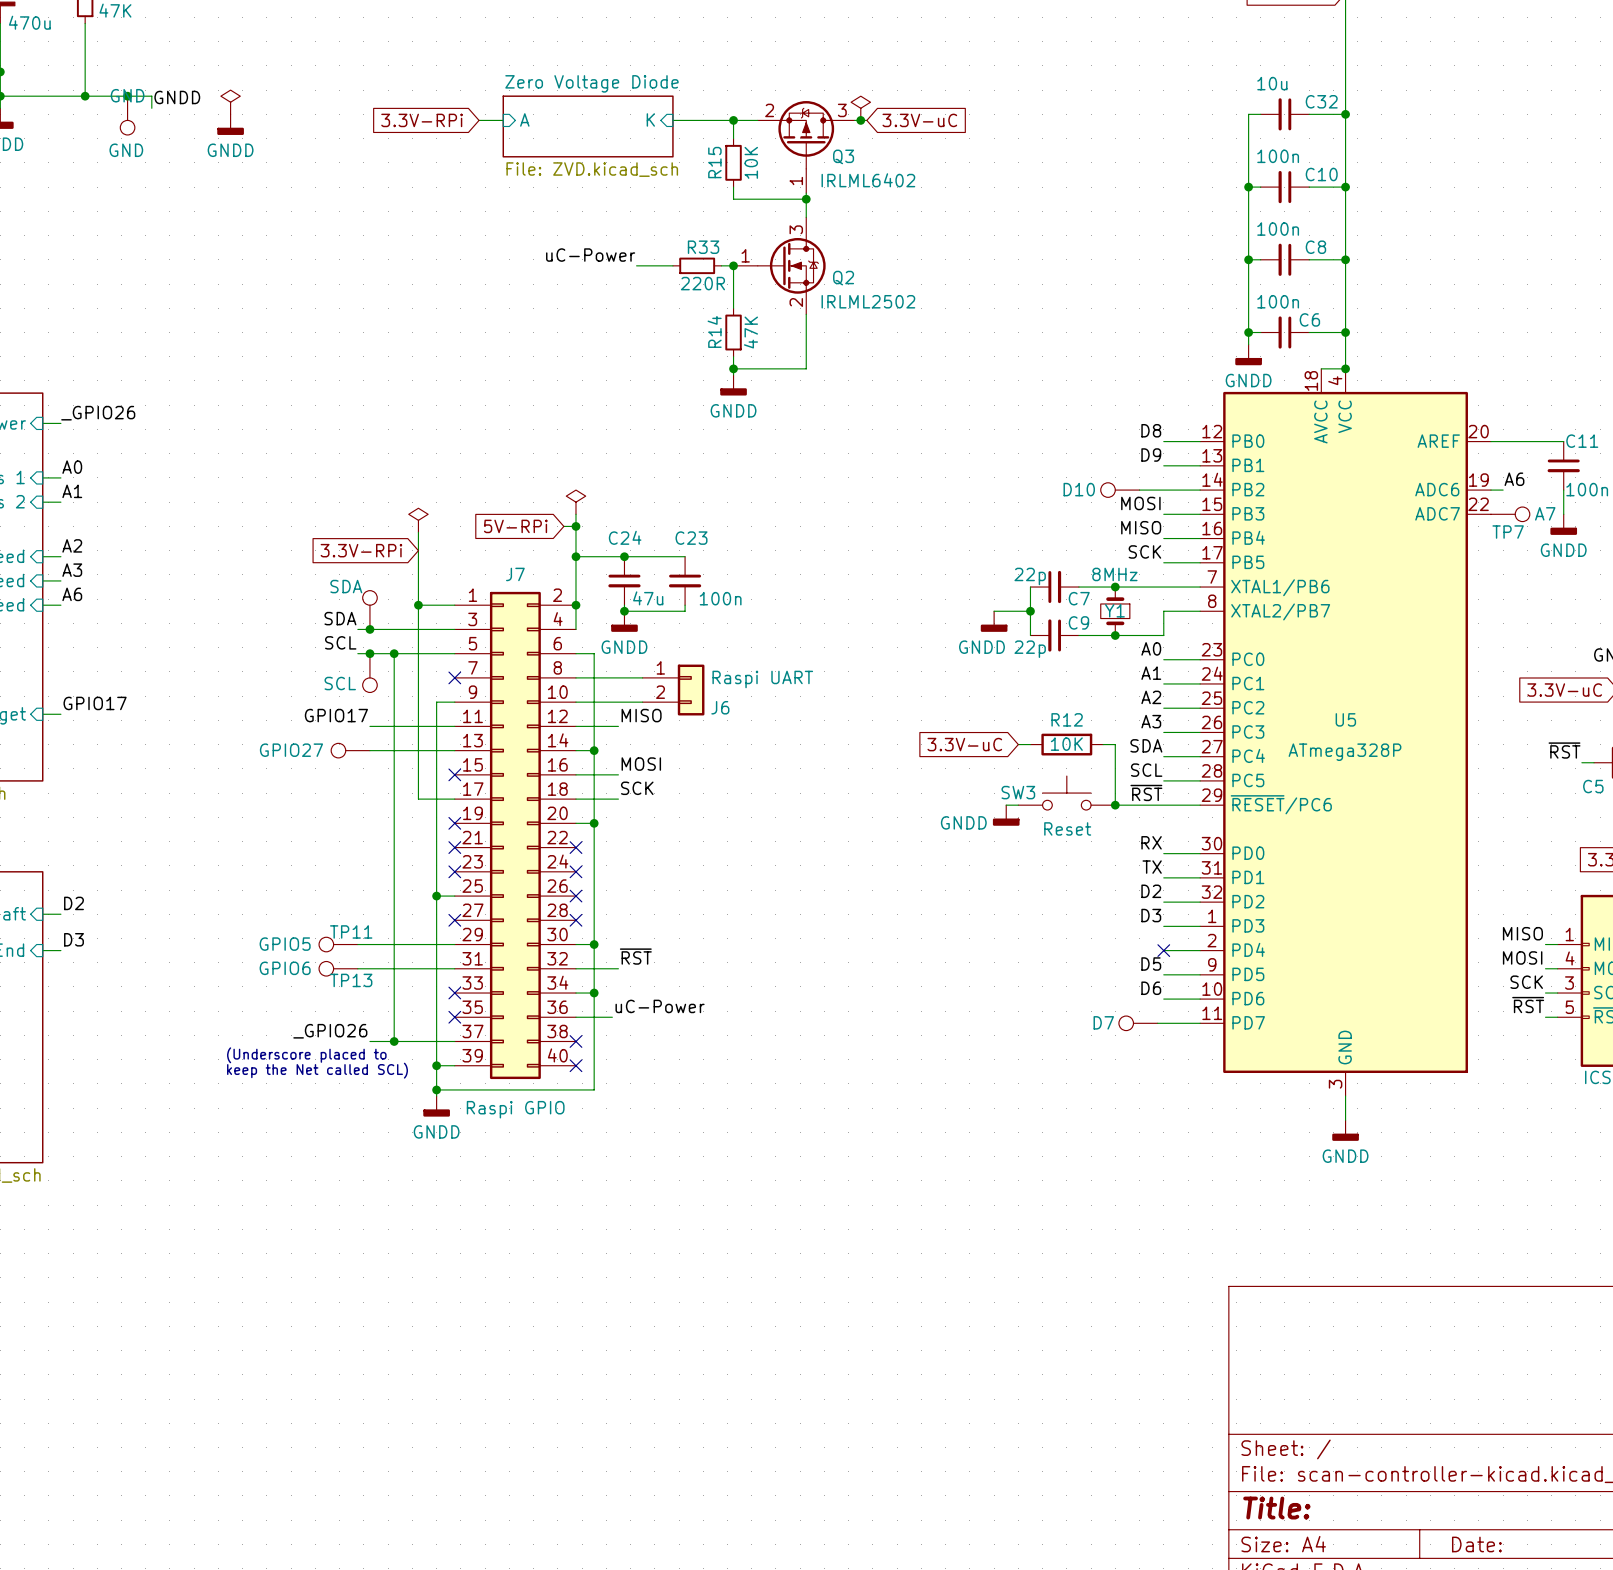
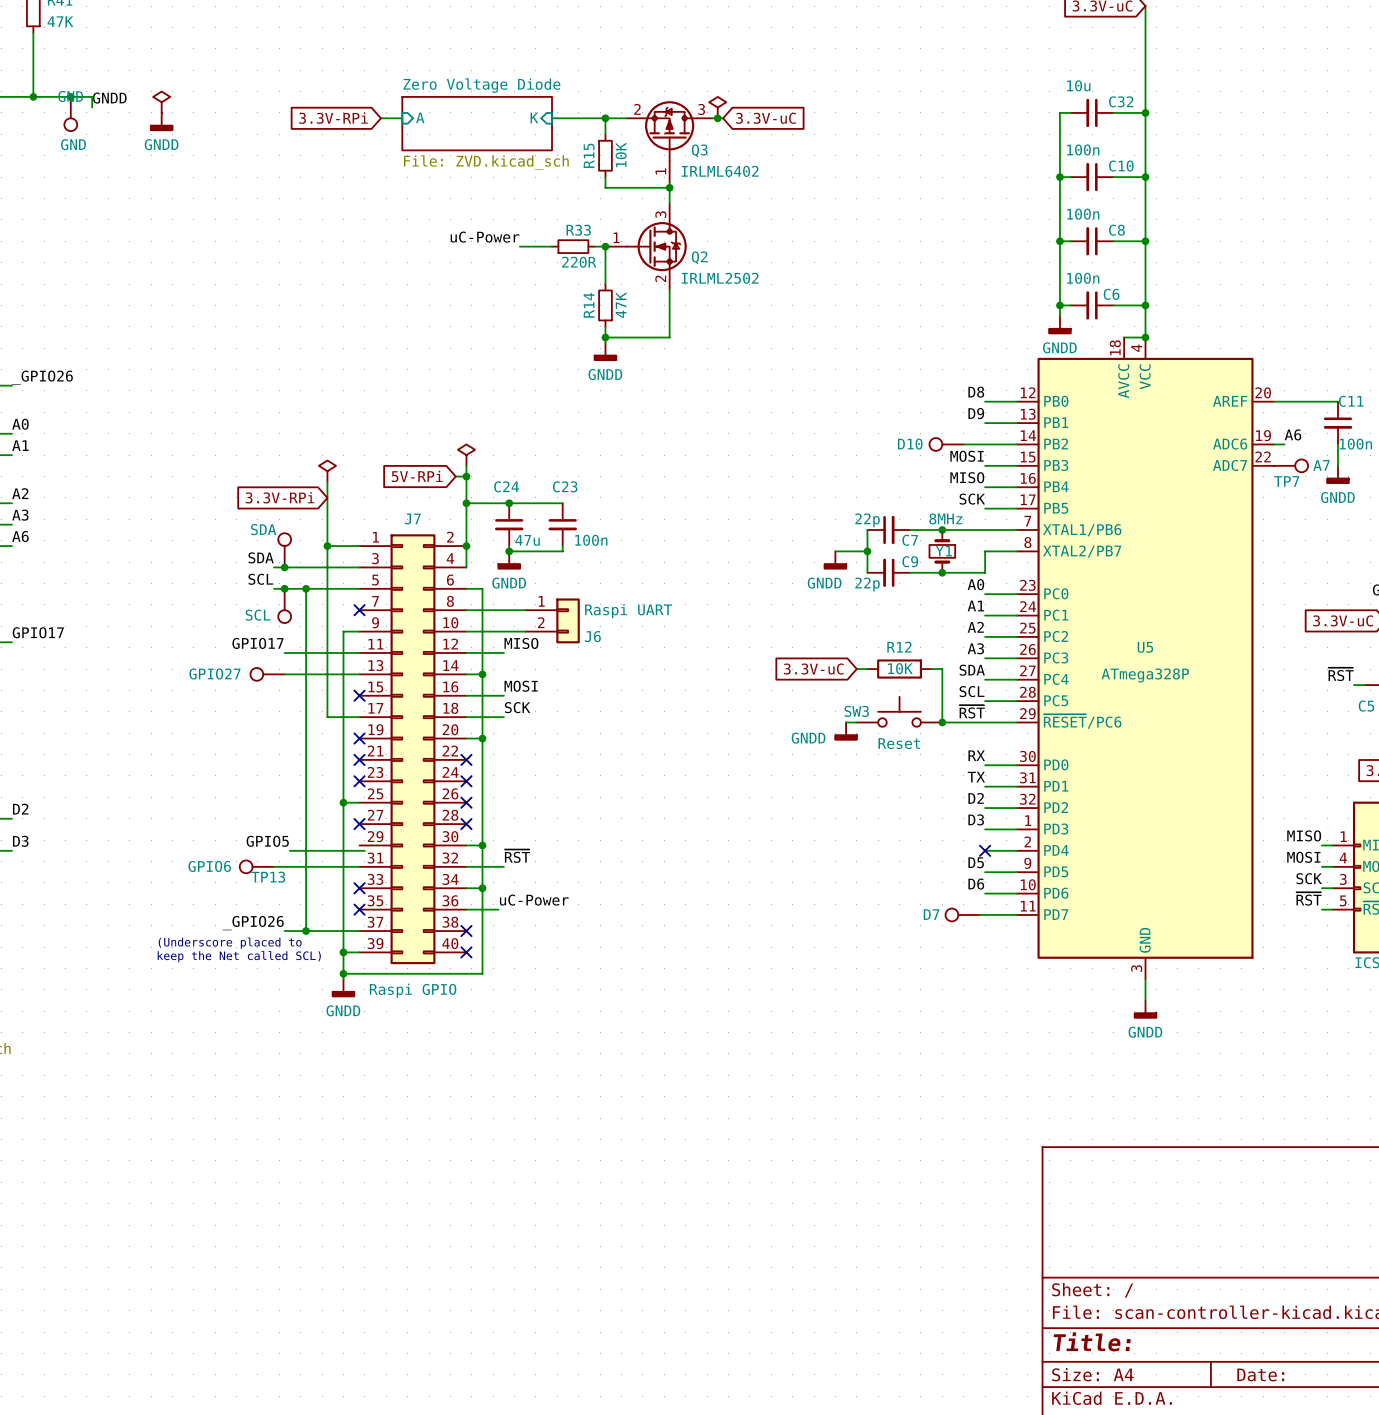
label: none -> GPIO5 (267, 841)
TP11: (338, 944) -> none
wire: (357, 944) (454, 944) -> none
wire: none -> (290, 850) (364, 850)

